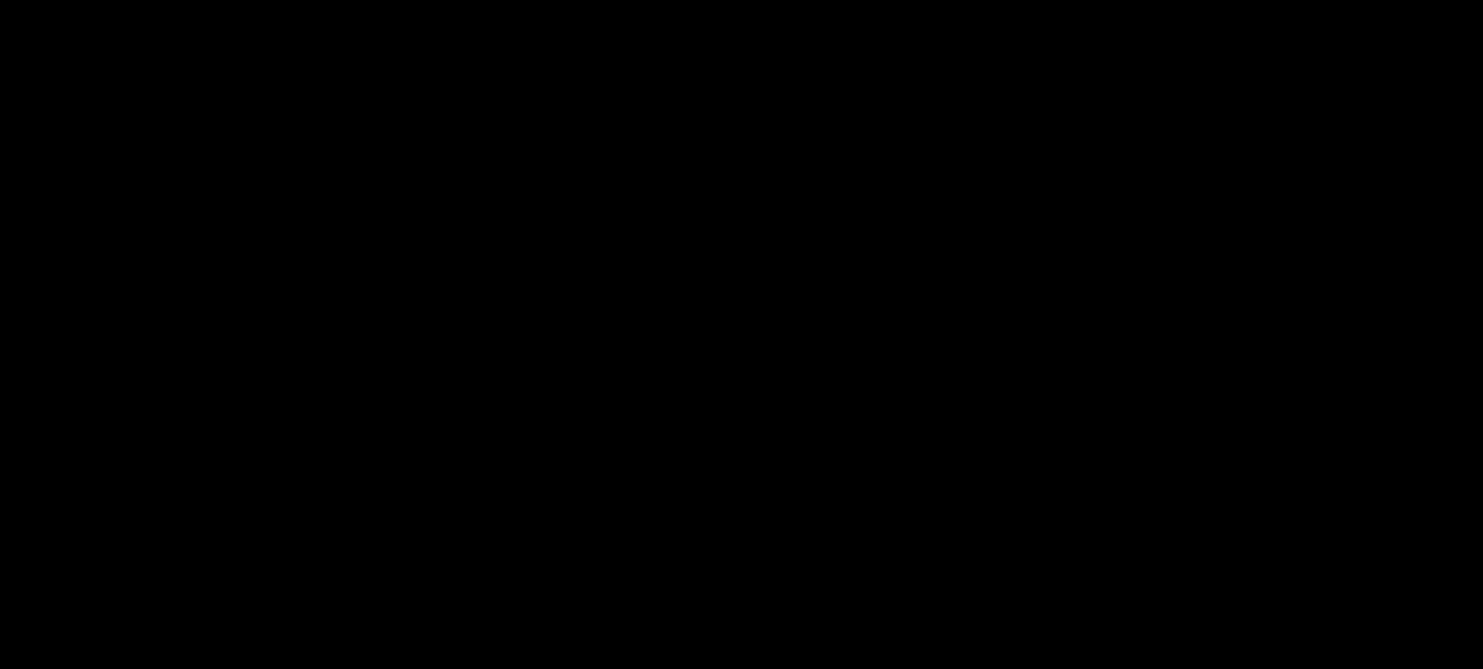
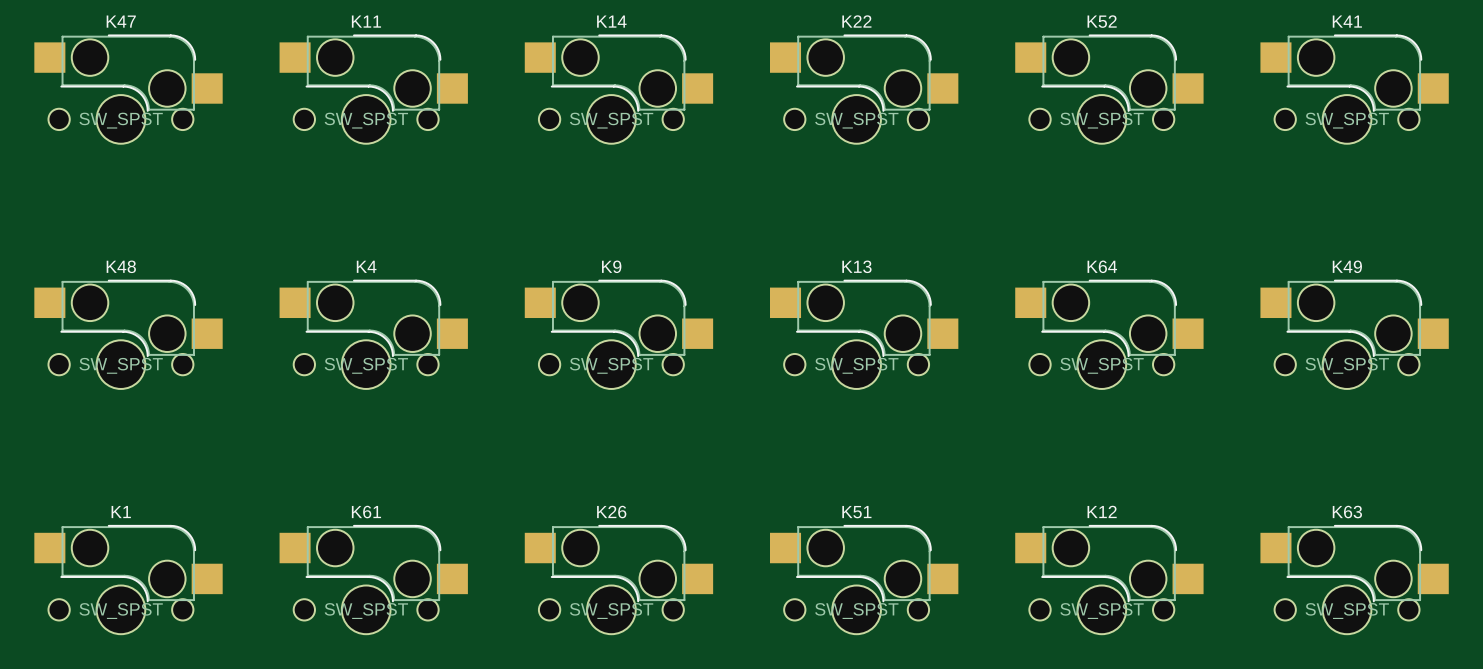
K47: none -> SW_SPST (128, 89)
K11: none -> SW_SPST (373, 89)
K14: none -> SW_SPST (618, 89)
K22: none -> SW_SPST (864, 89)
K52: none -> SW_SPST (1109, 89)
K41: none -> SW_SPST (1354, 89)
K48: none -> SW_SPST (128, 334)
K4: none -> SW_SPST (373, 334)
K9: none -> SW_SPST (618, 334)
K13: none -> SW_SPST (864, 334)
K64: none -> SW_SPST (1109, 334)
K49: none -> SW_SPST (1354, 334)
K1: none -> SW_SPST (128, 579)
K61: none -> SW_SPST (373, 579)
K26: none -> SW_SPST (618, 579)
K51: none -> SW_SPST (864, 579)
K12: none -> SW_SPST (1109, 579)
K63: none -> SW_SPST (1354, 579)

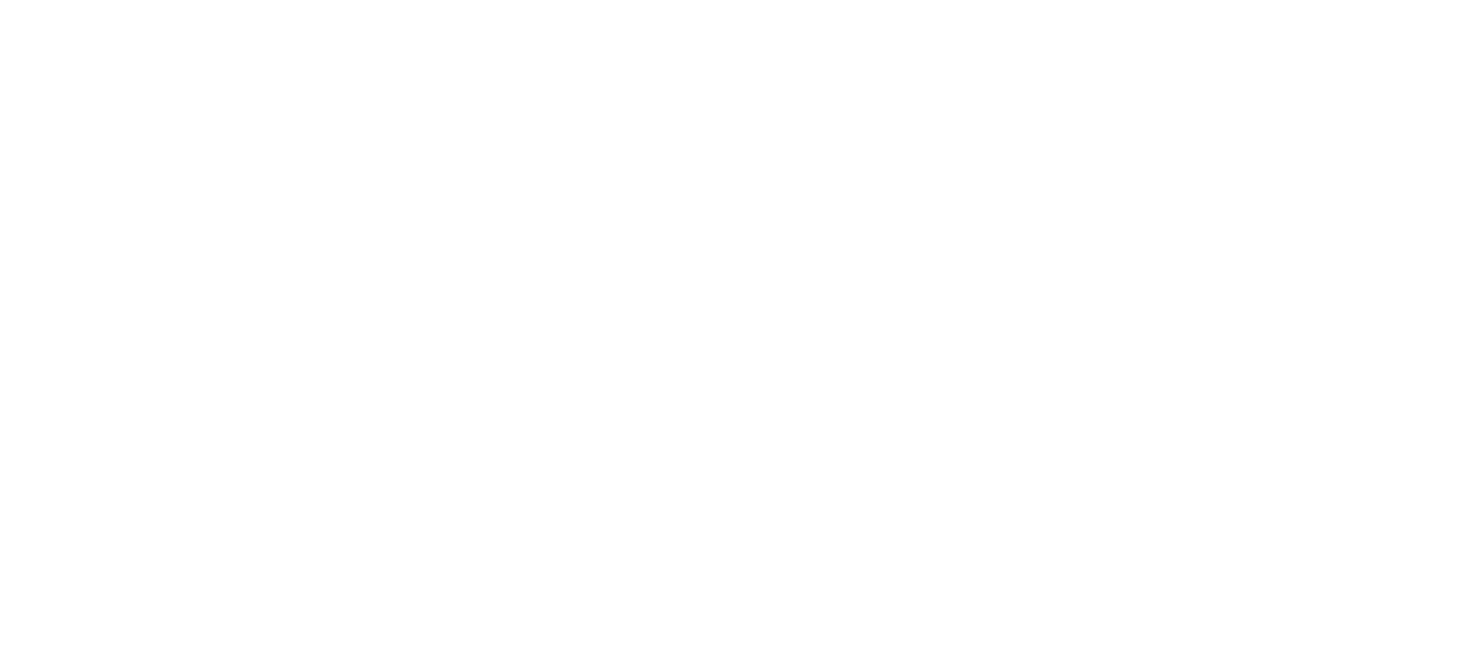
K47: SW_SPST (128, 89) -> none
K11: SW_SPST (373, 89) -> none
K14: SW_SPST (618, 89) -> none
K22: SW_SPST (864, 89) -> none
K52: SW_SPST (1109, 89) -> none
K41: SW_SPST (1354, 89) -> none
K48: SW_SPST (128, 334) -> none
K4: SW_SPST (373, 334) -> none
K9: SW_SPST (618, 334) -> none
K13: SW_SPST (864, 334) -> none
K64: SW_SPST (1109, 334) -> none
K49: SW_SPST (1354, 334) -> none
K1: SW_SPST (128, 579) -> none
K61: SW_SPST (373, 579) -> none
K26: SW_SPST (618, 579) -> none
K51: SW_SPST (864, 579) -> none
K12: SW_SPST (1109, 579) -> none
K63: SW_SPST (1354, 579) -> none

